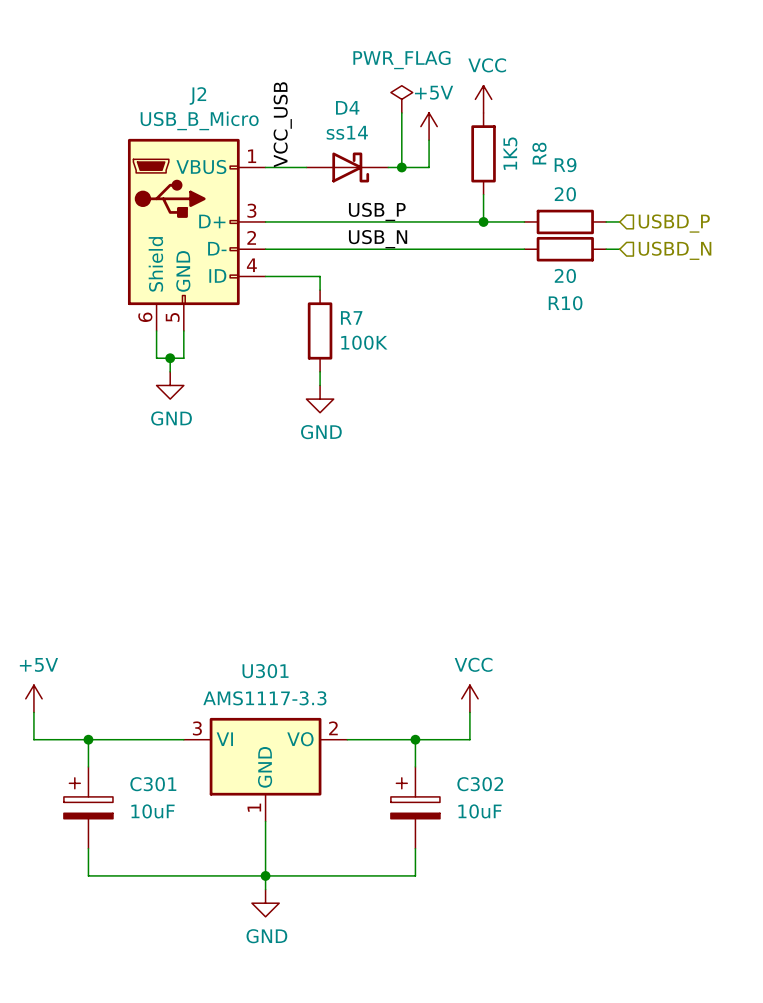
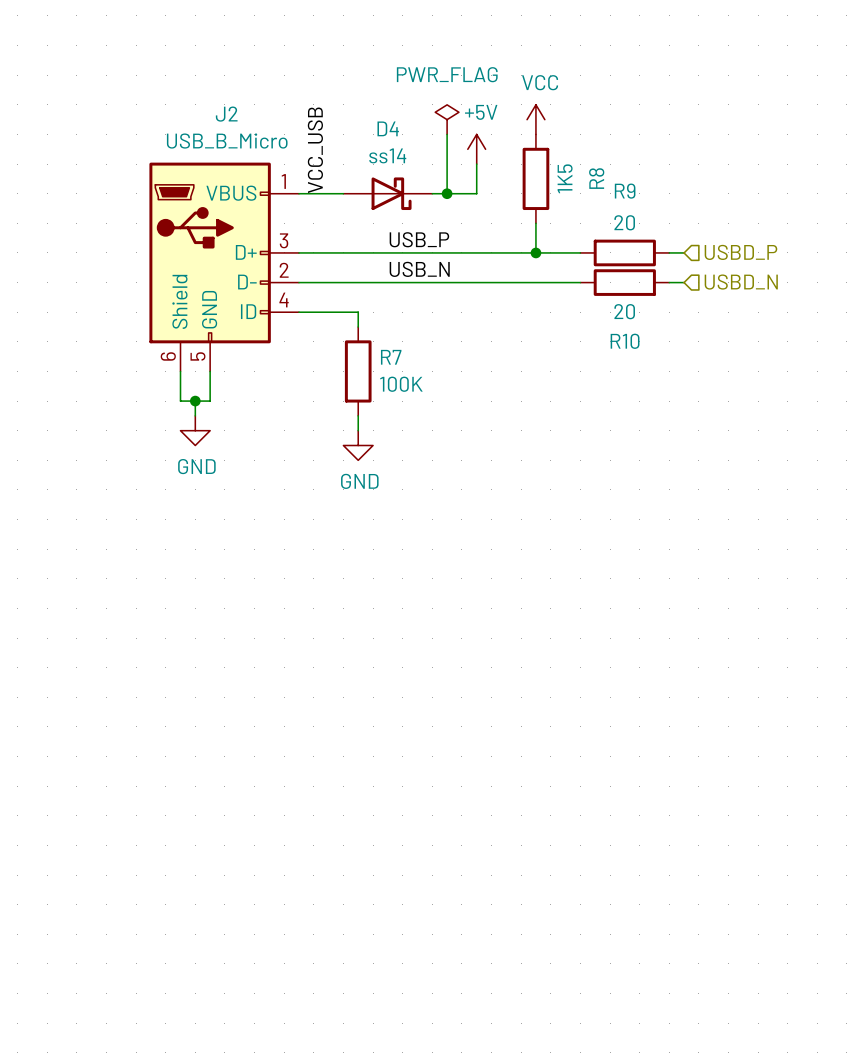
power symbol: +5V (33, 698) -> none
power symbol: VCC (469, 698) -> none
wire: (33, 712) (33, 739) (183, 739) -> none
wire: (469, 712) (469, 739) (347, 739) -> none
wire: (88, 739) (88, 766) -> none
junction: (88, 739) -> none
wire: (415, 739) (415, 766) -> none
junction: (415, 739) -> none
U301: AMS1117-3.3 (265, 769) -> none
C301: 10uF (88, 807) -> none
C302: 10uF (415, 807) -> none
wire: (265, 821) (265, 889) -> none
wire: (88, 848) (88, 875) (415, 875) (415, 848) -> none
junction: (265, 875) -> none
power symbol: GND (265, 903) -> none

